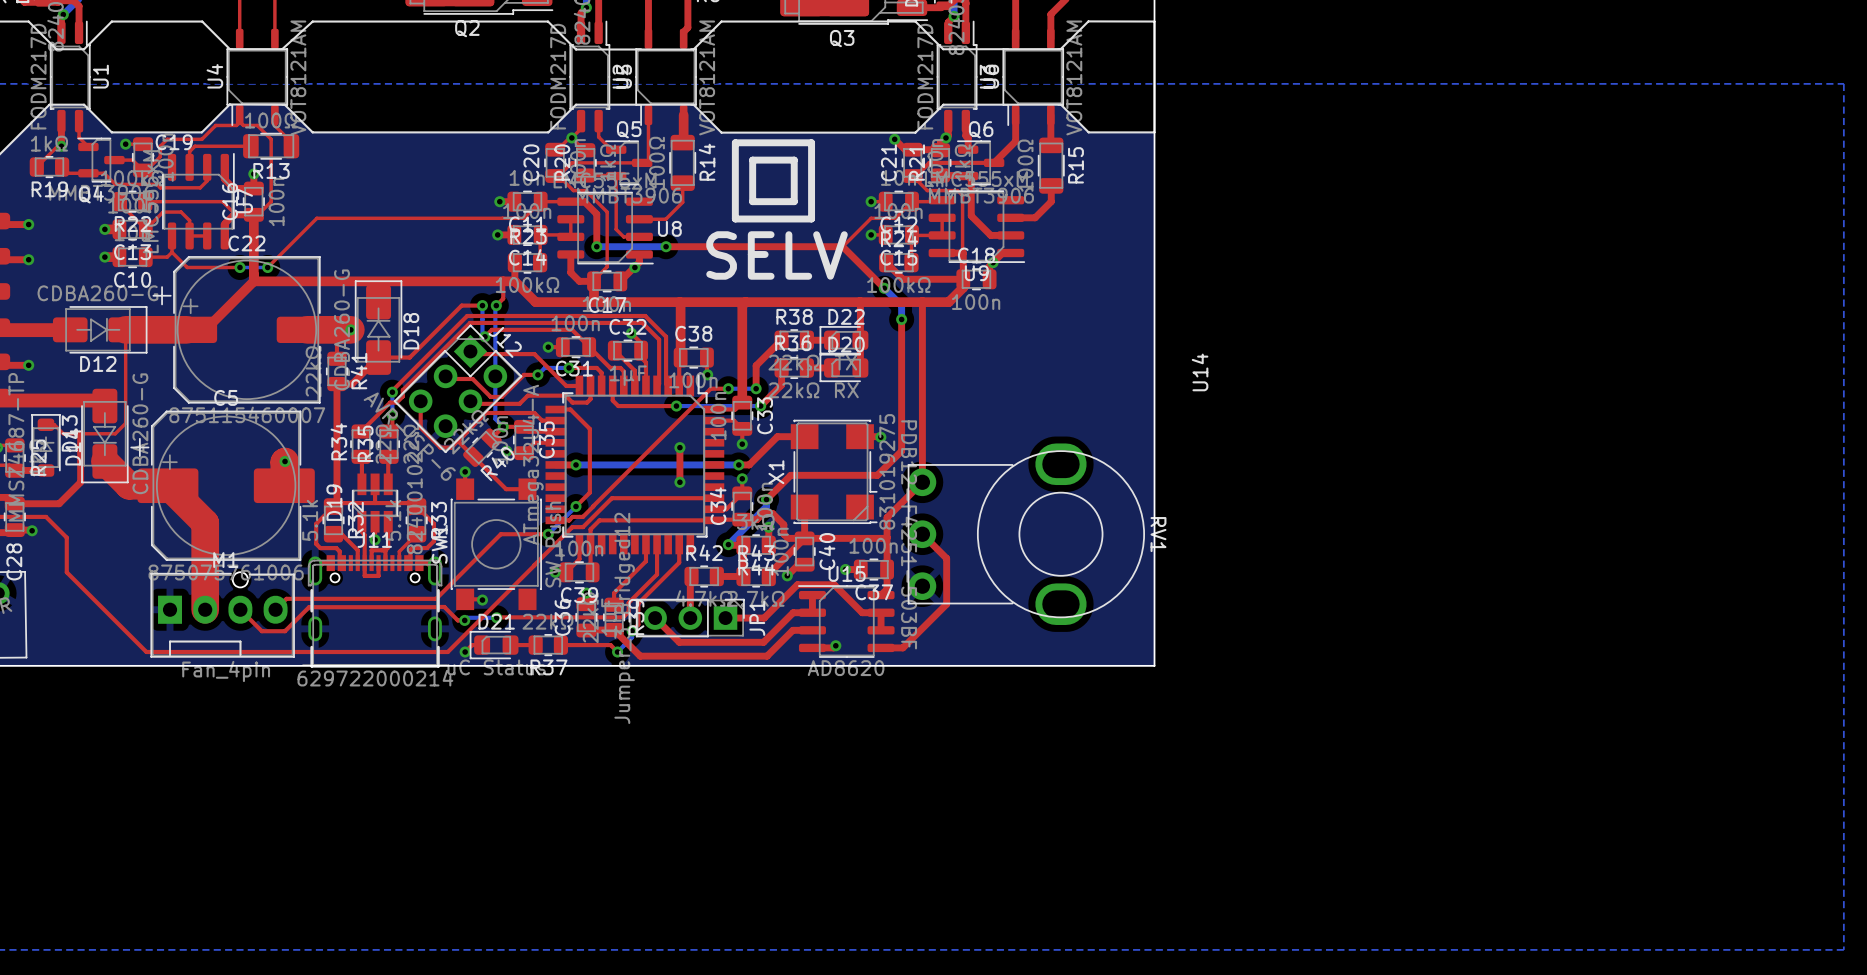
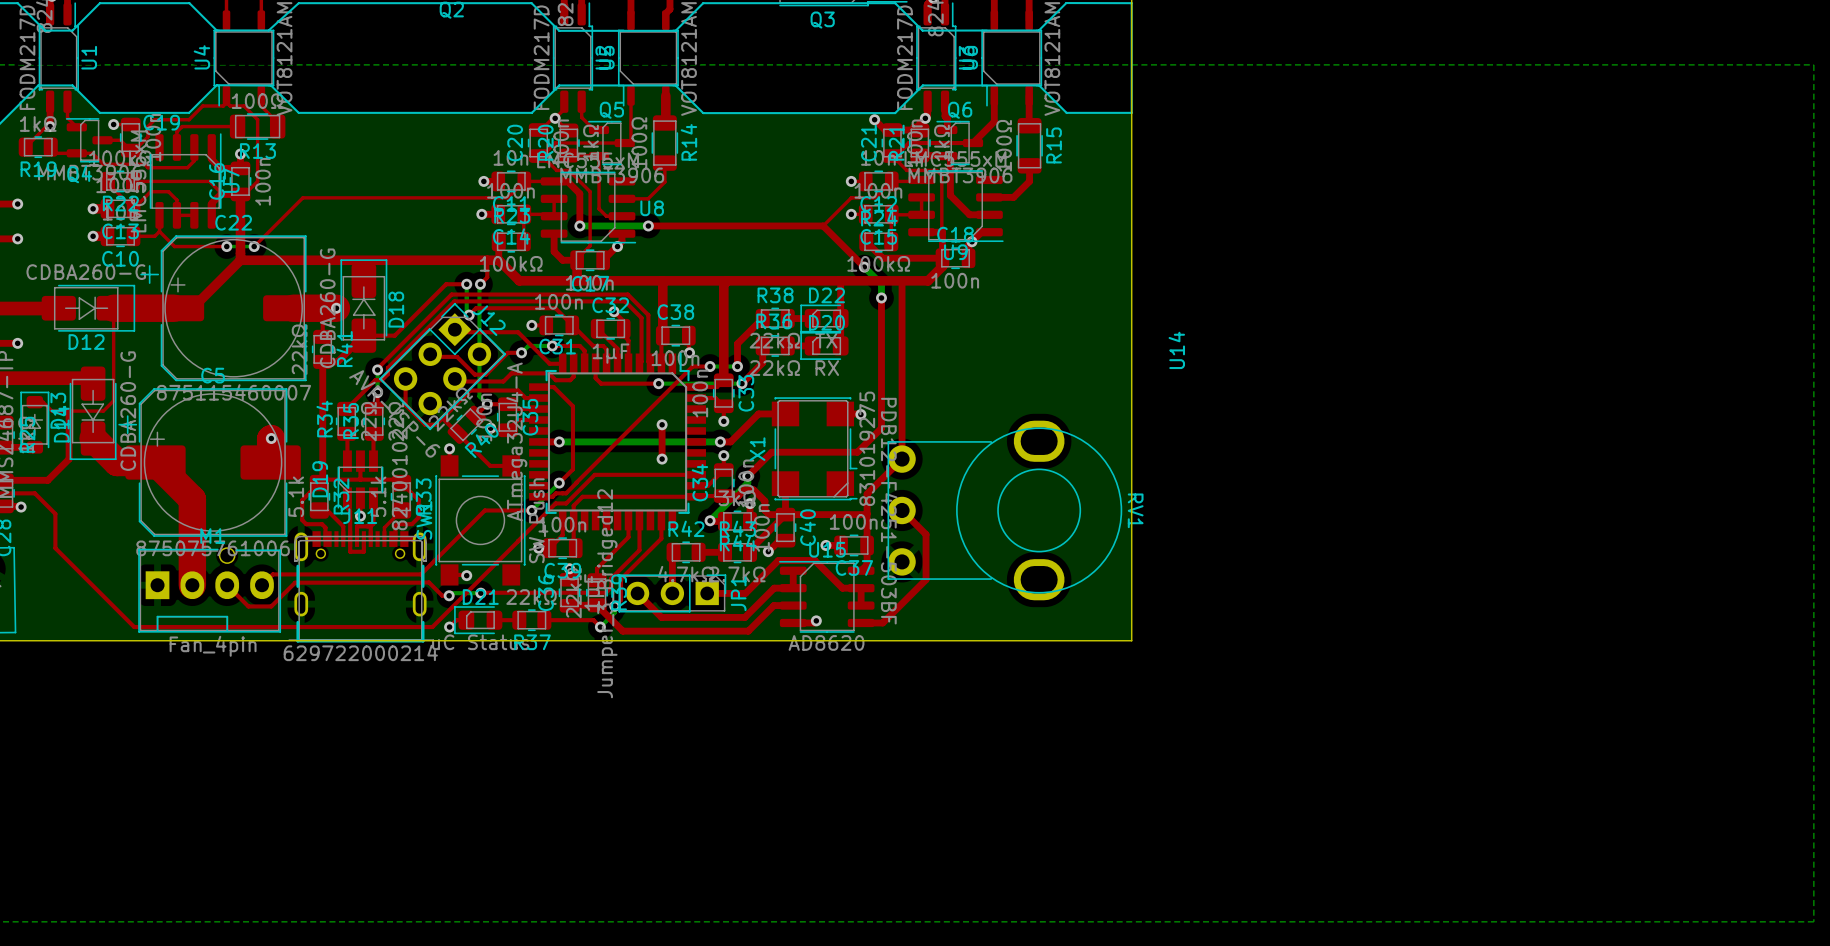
line: (735, 142) (811, 142) (811, 218) (735, 218) (735, 142) -> none
line: (752, 160) (794, 160) (794, 201) (752, 201) (752, 160) -> none
text: SELV (777, 255) -> none

